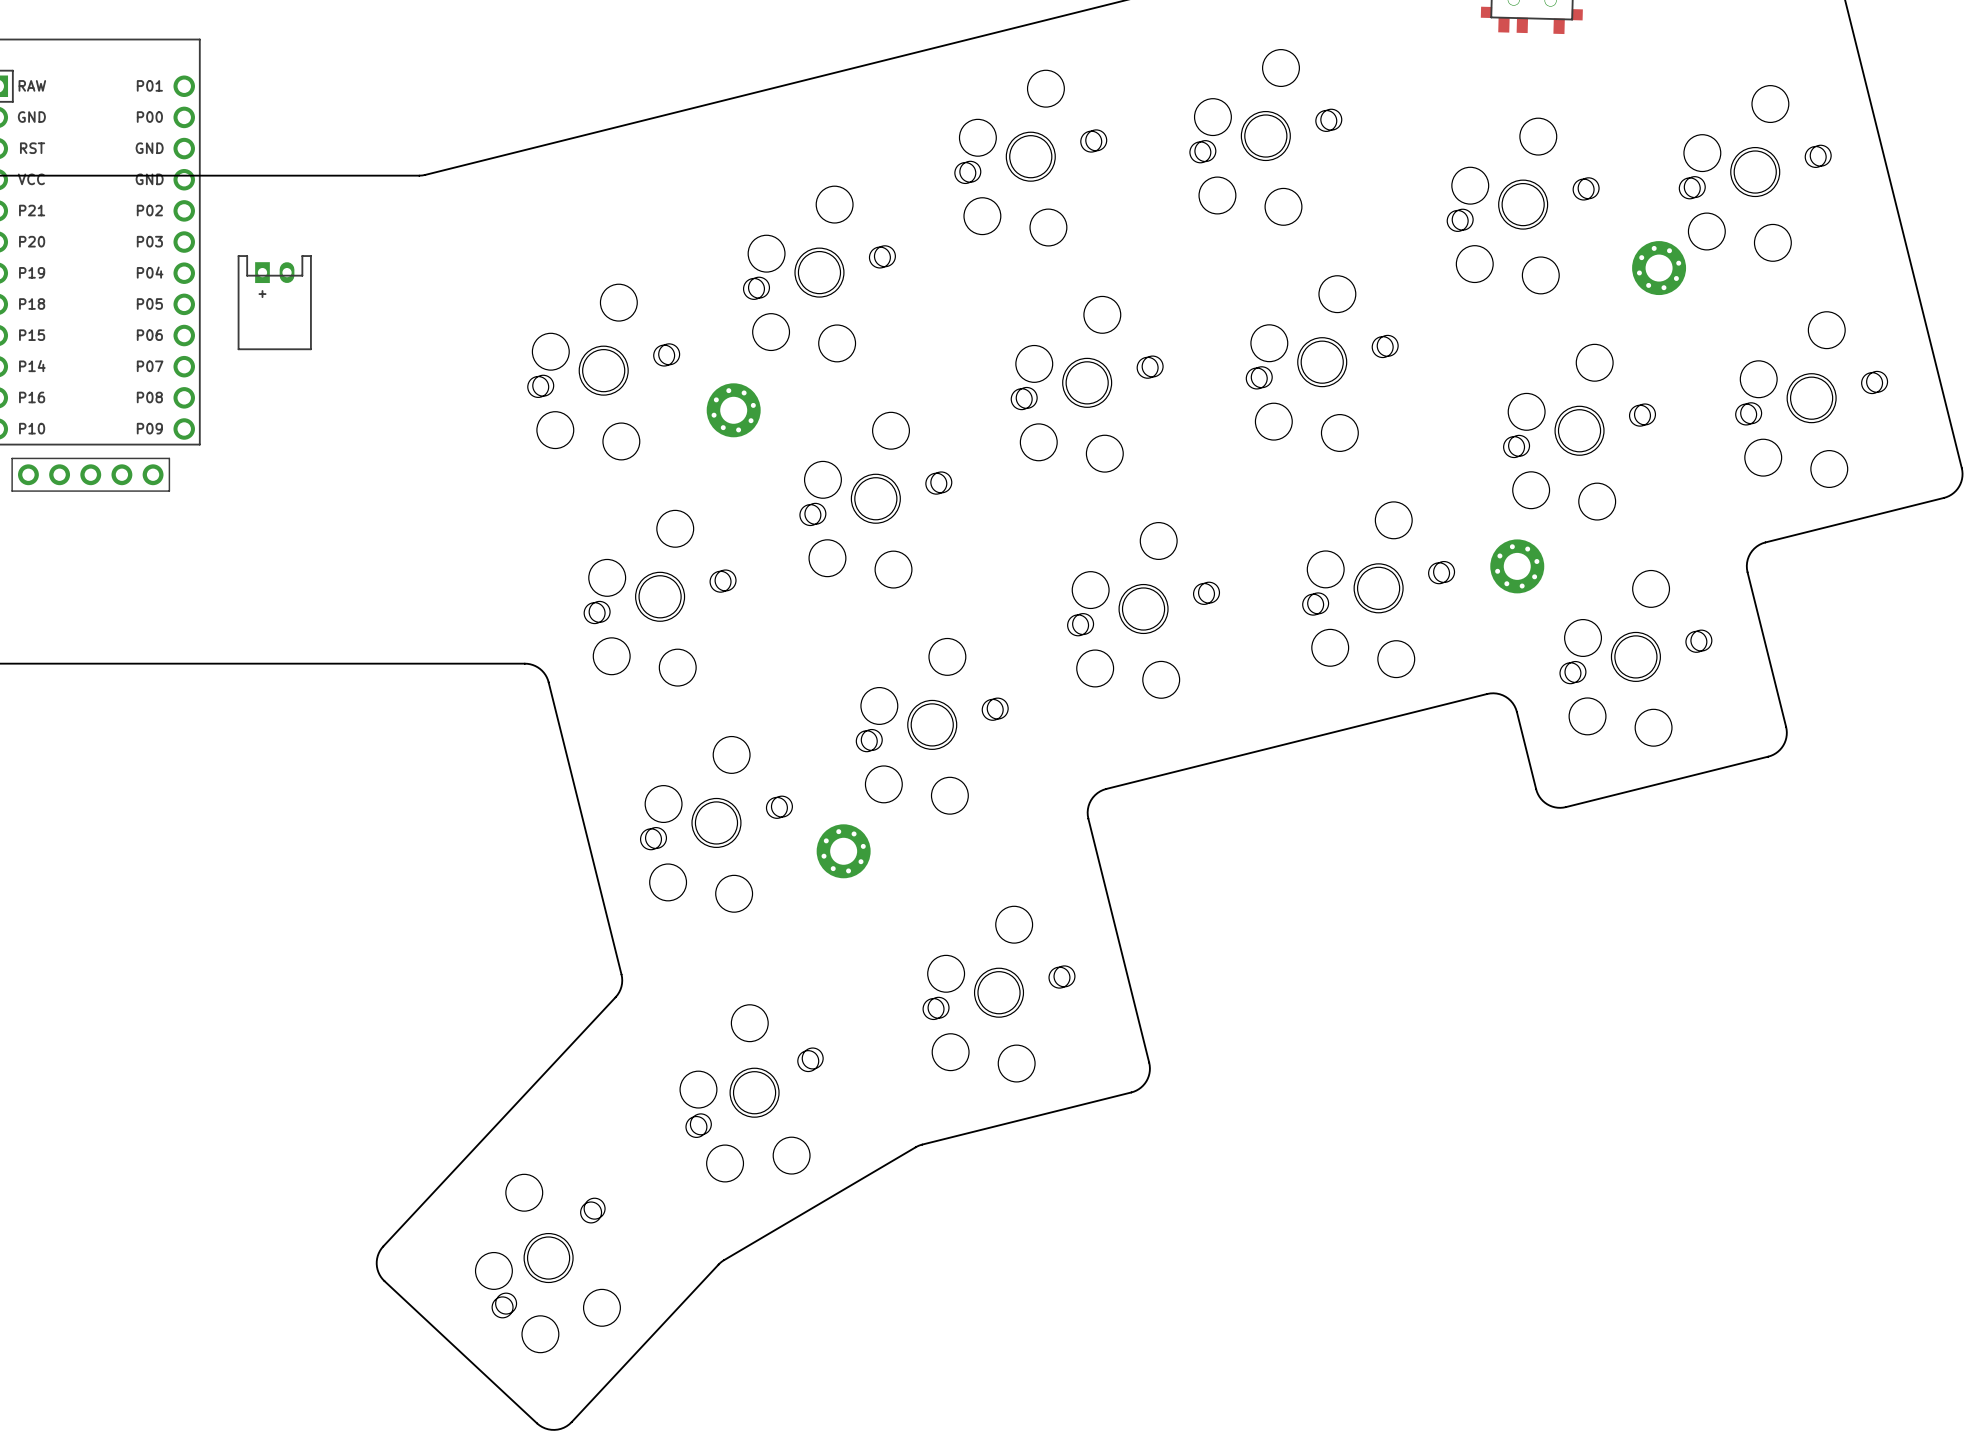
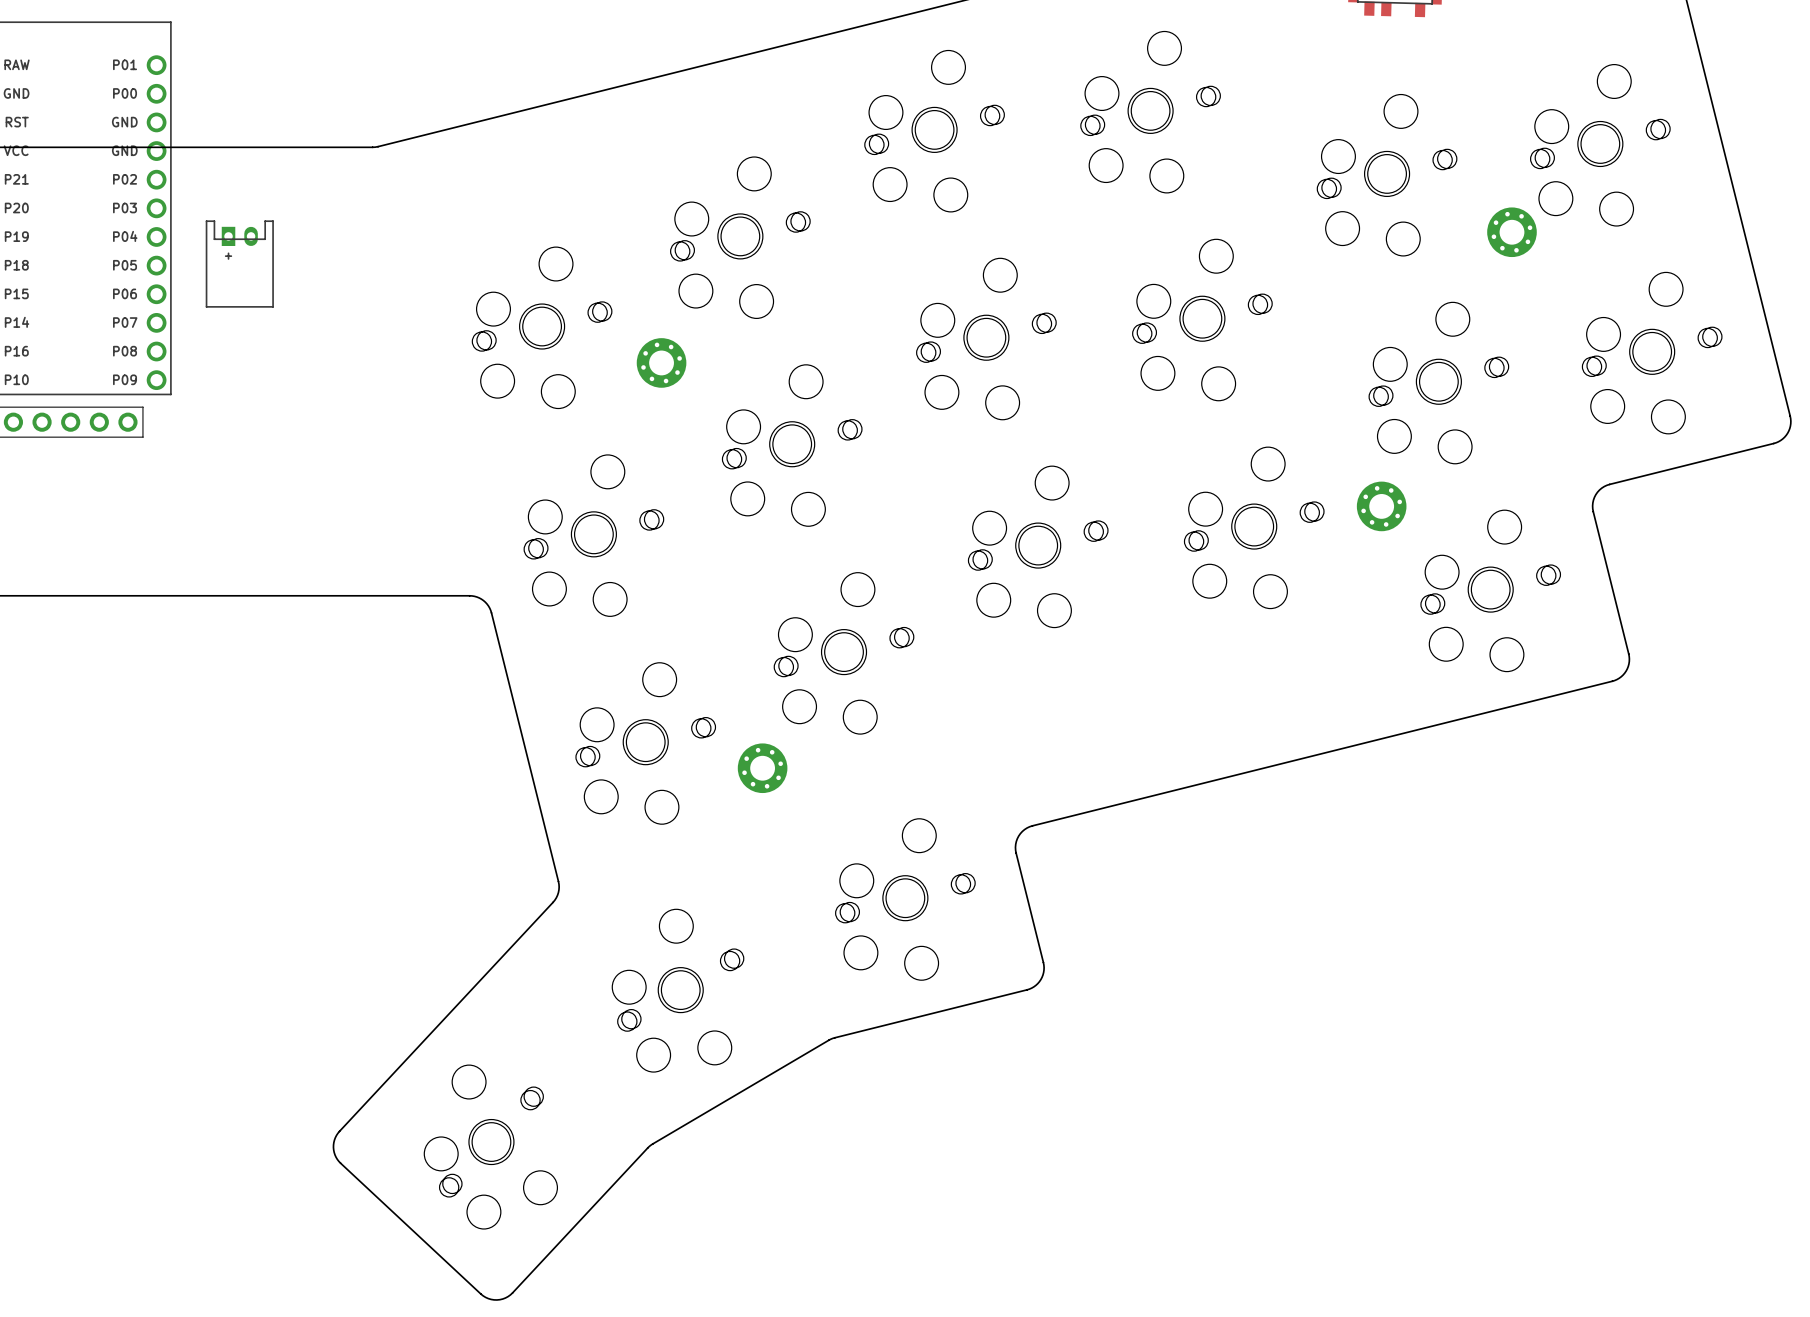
board edge: (1565, 807) (1552, 806) (1539, 796) (1515, 708) (1505, 696) (1493, 693) (1106, 788) (1097, 793) (1091, 800) (1087, 815) (1119, 943) -> (1426, 727) (1032, 825) (1024, 829) (1018, 836) (1015, 844) (1016, 853)

